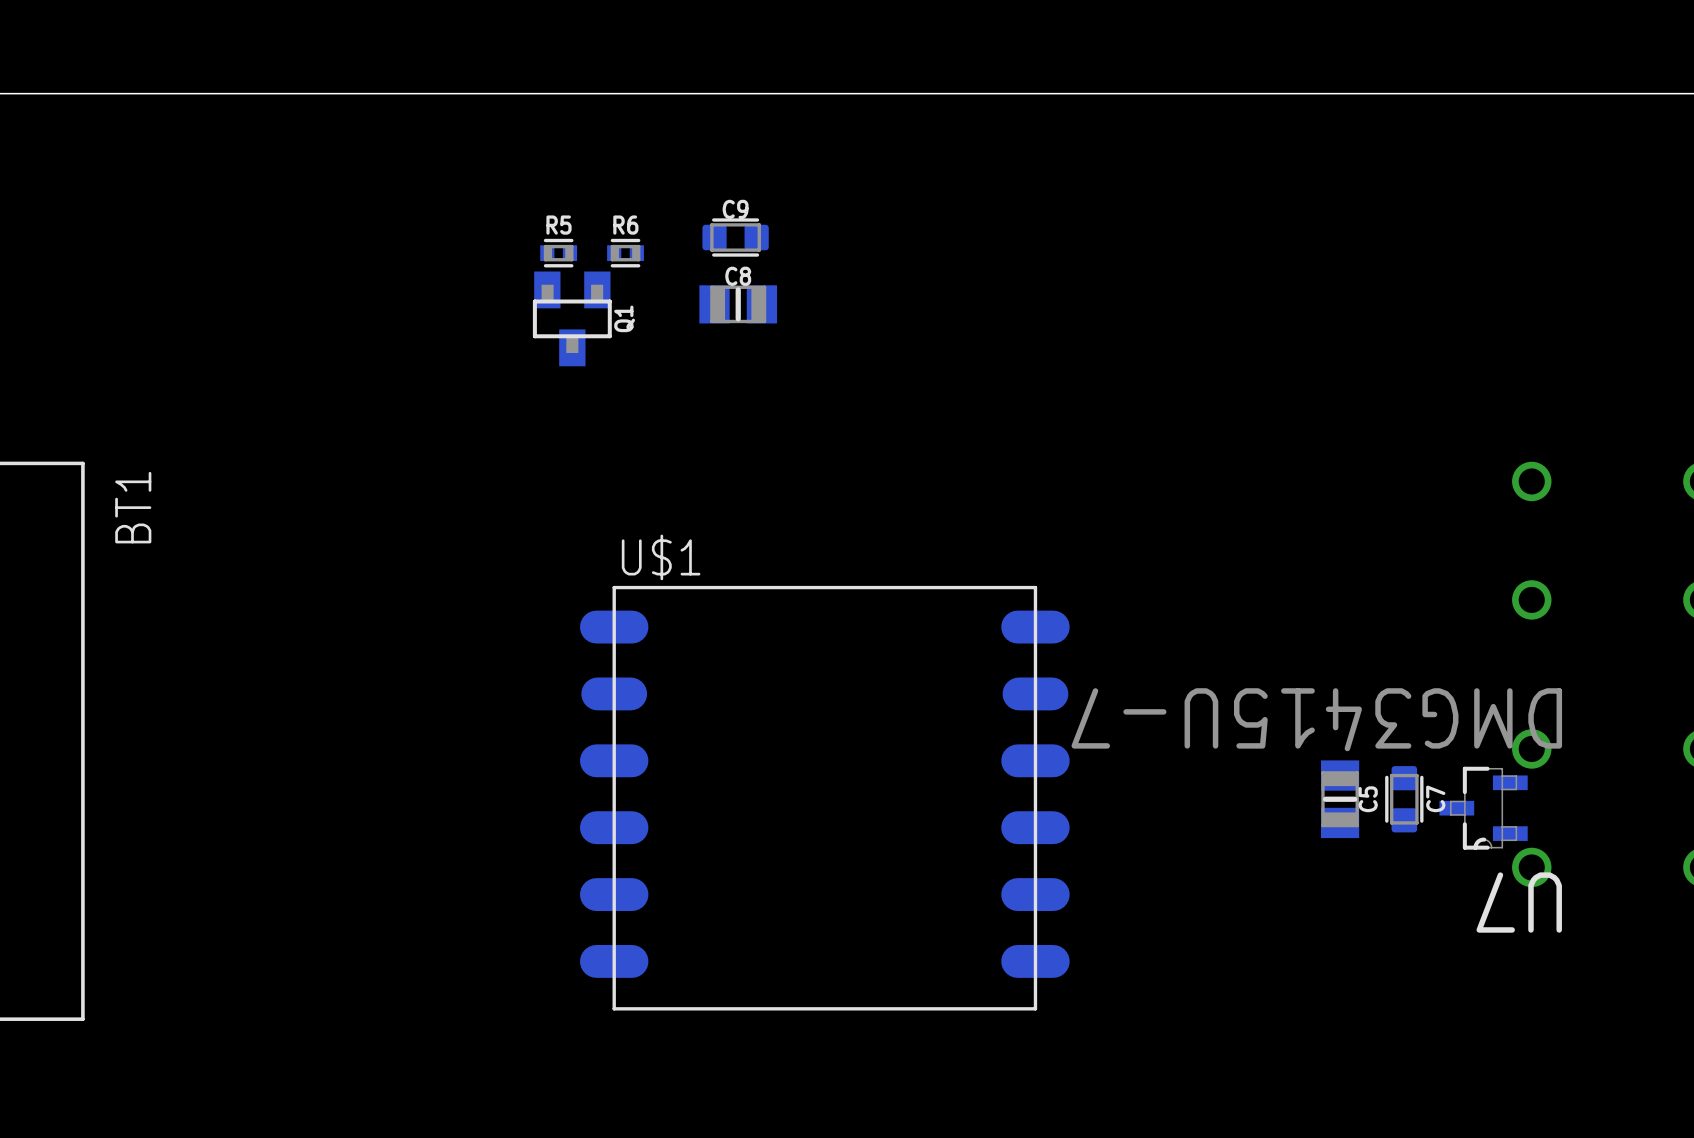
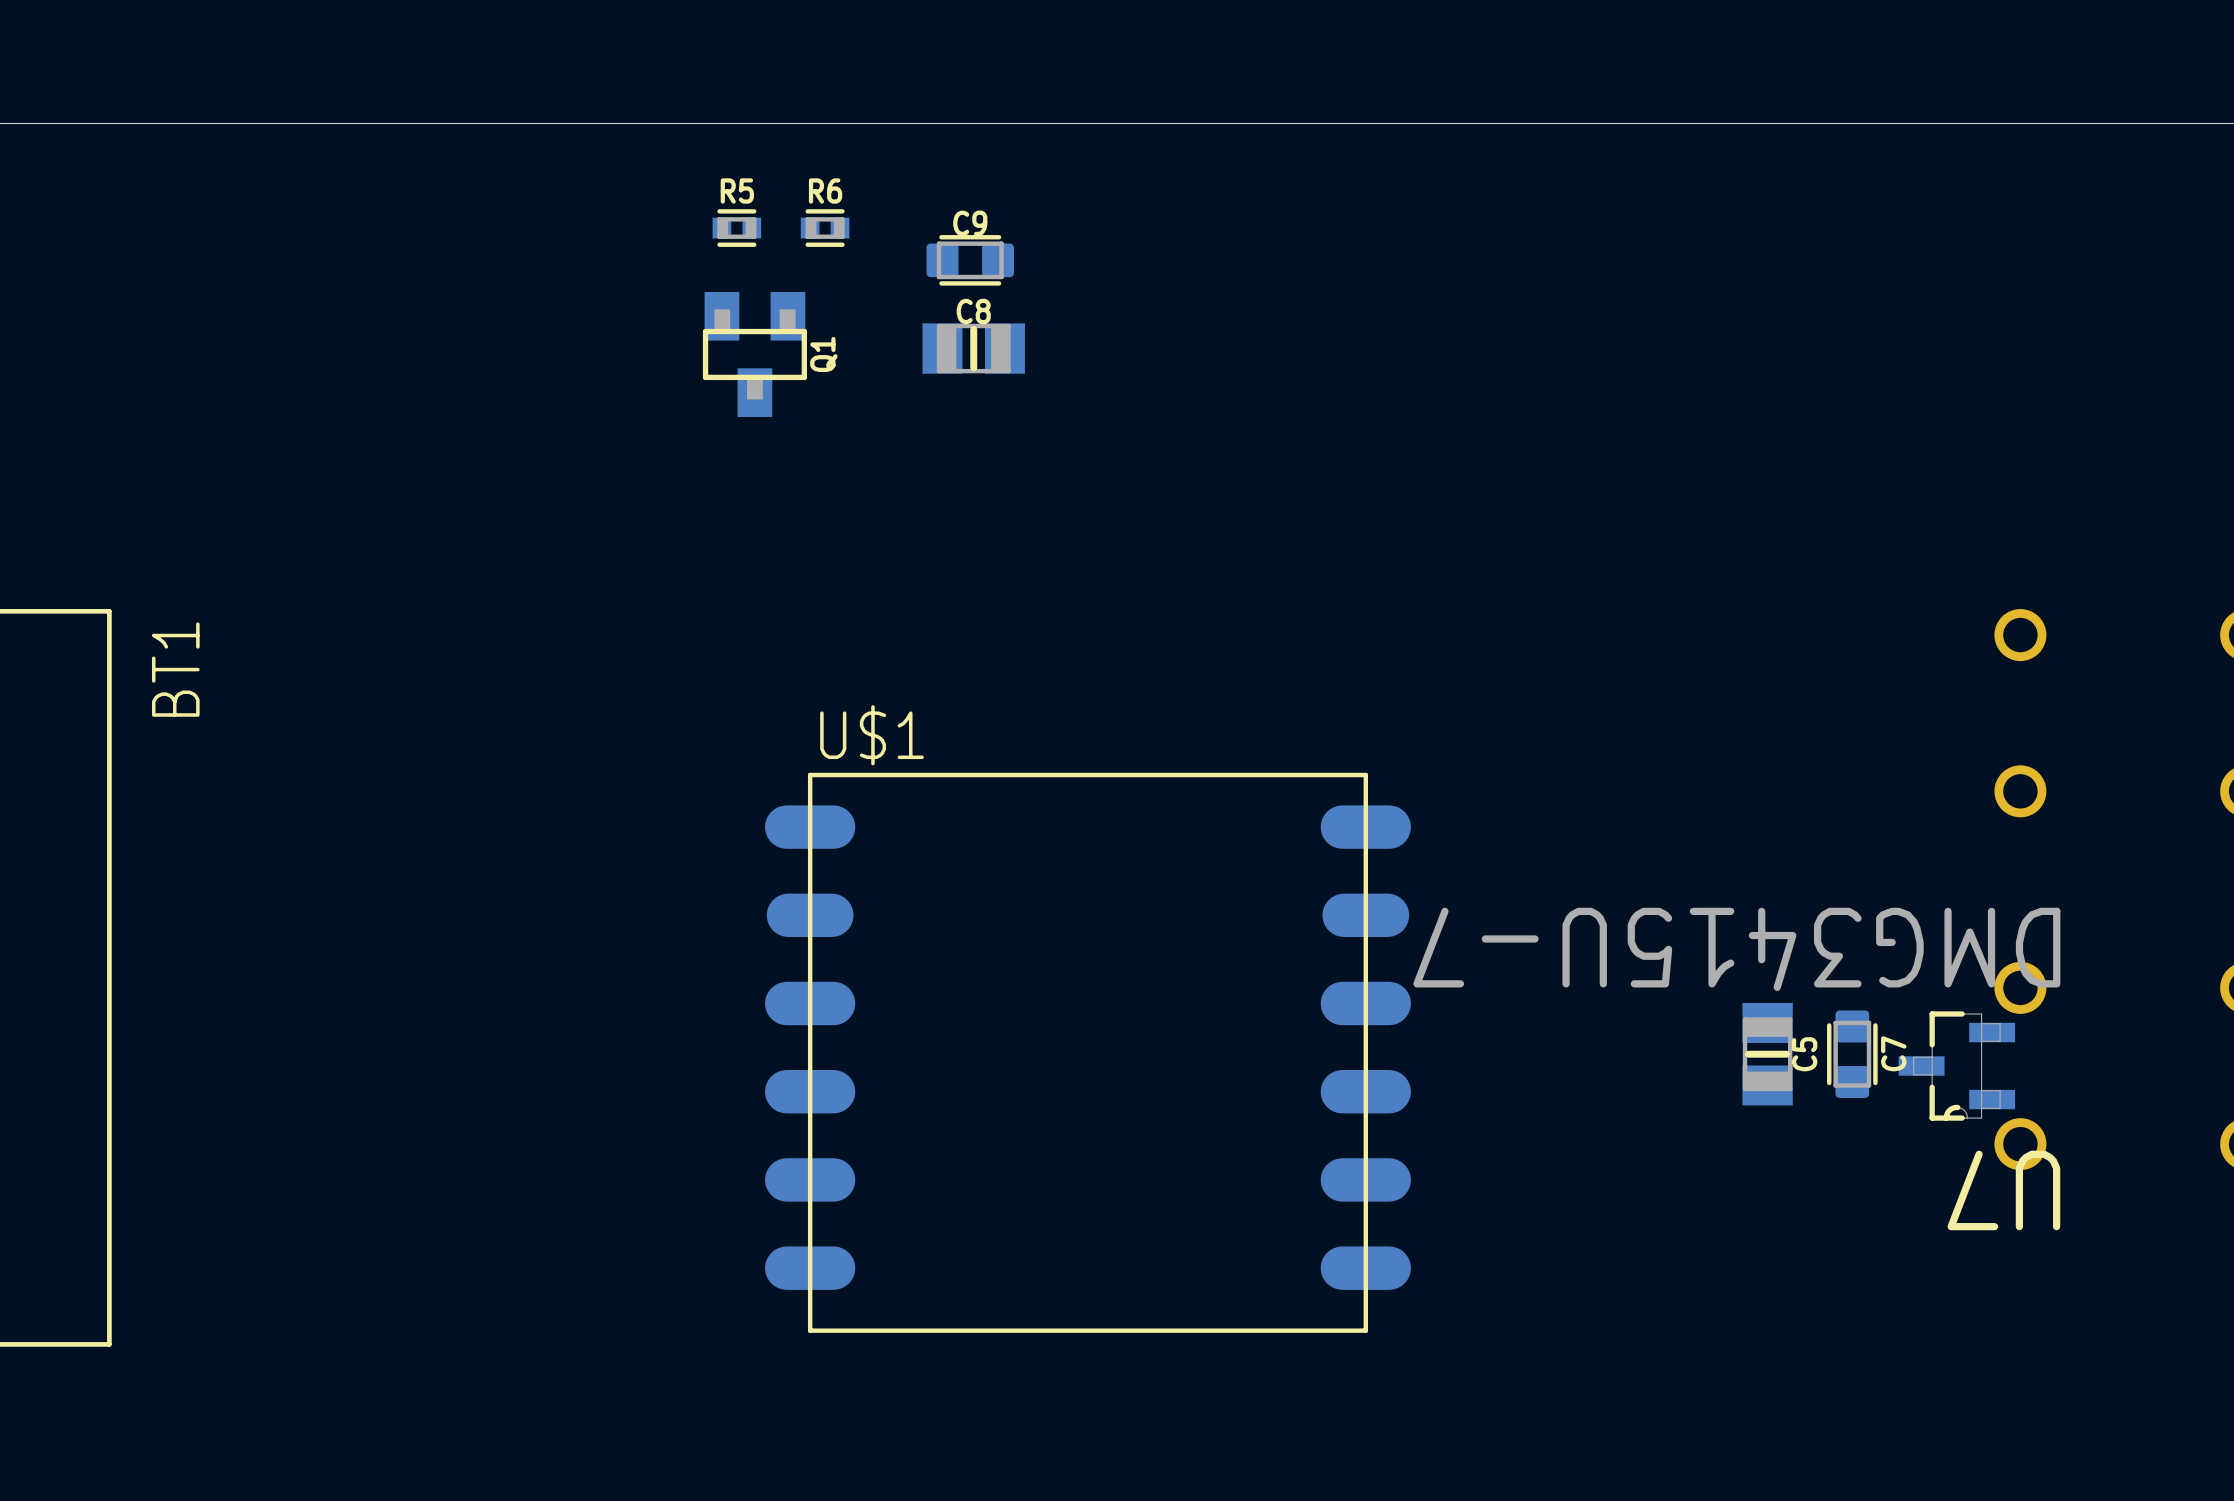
C9 position: (735, 237) -> (970, 260)
R5 position: (558, 253) -> (736, 228)
R6 position: (625, 253) -> (825, 228)
C8 position: (738, 304) -> (973, 348)
Q1 position: (572, 318) -> (754, 354)

